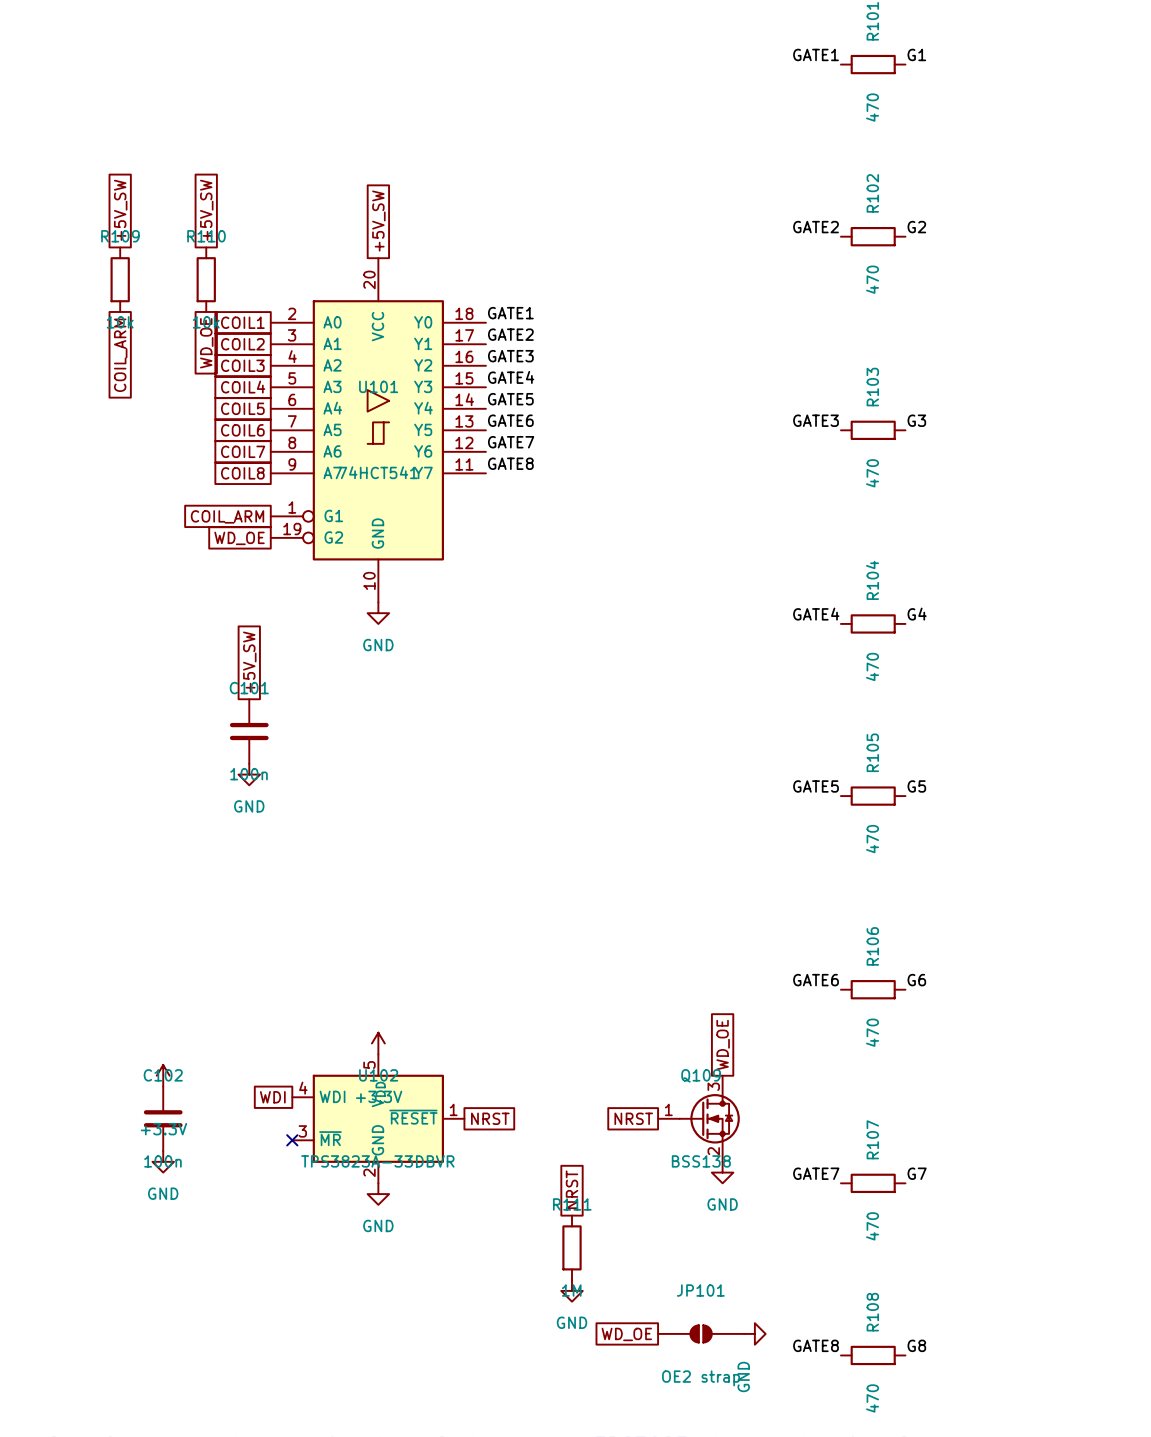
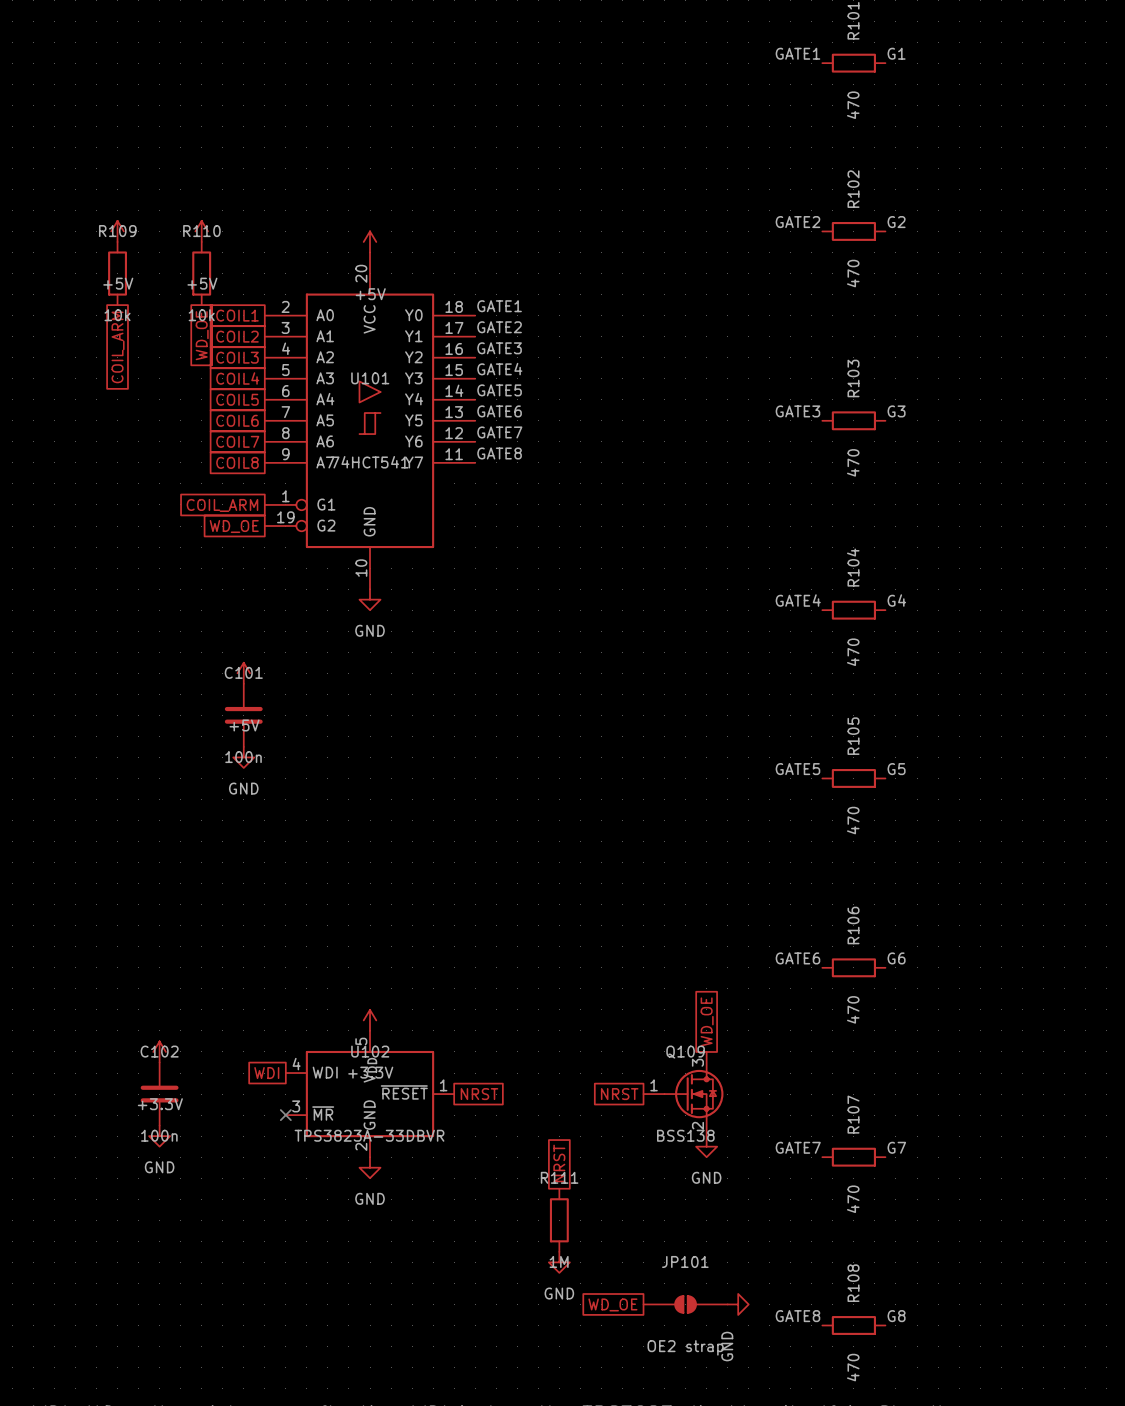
global label: +5V_SW (120, 210) -> none
global label: +5V_SW (206, 210) -> none
global label: +5V_SW (378, 221) -> none
power symbol: none -> +5V (117, 231)
power symbol: none -> +5V (201, 231)
power symbol: none -> +5V (370, 241)
global label: +5V_SW (249, 662) -> none
power symbol: none -> +5V (243, 673)

